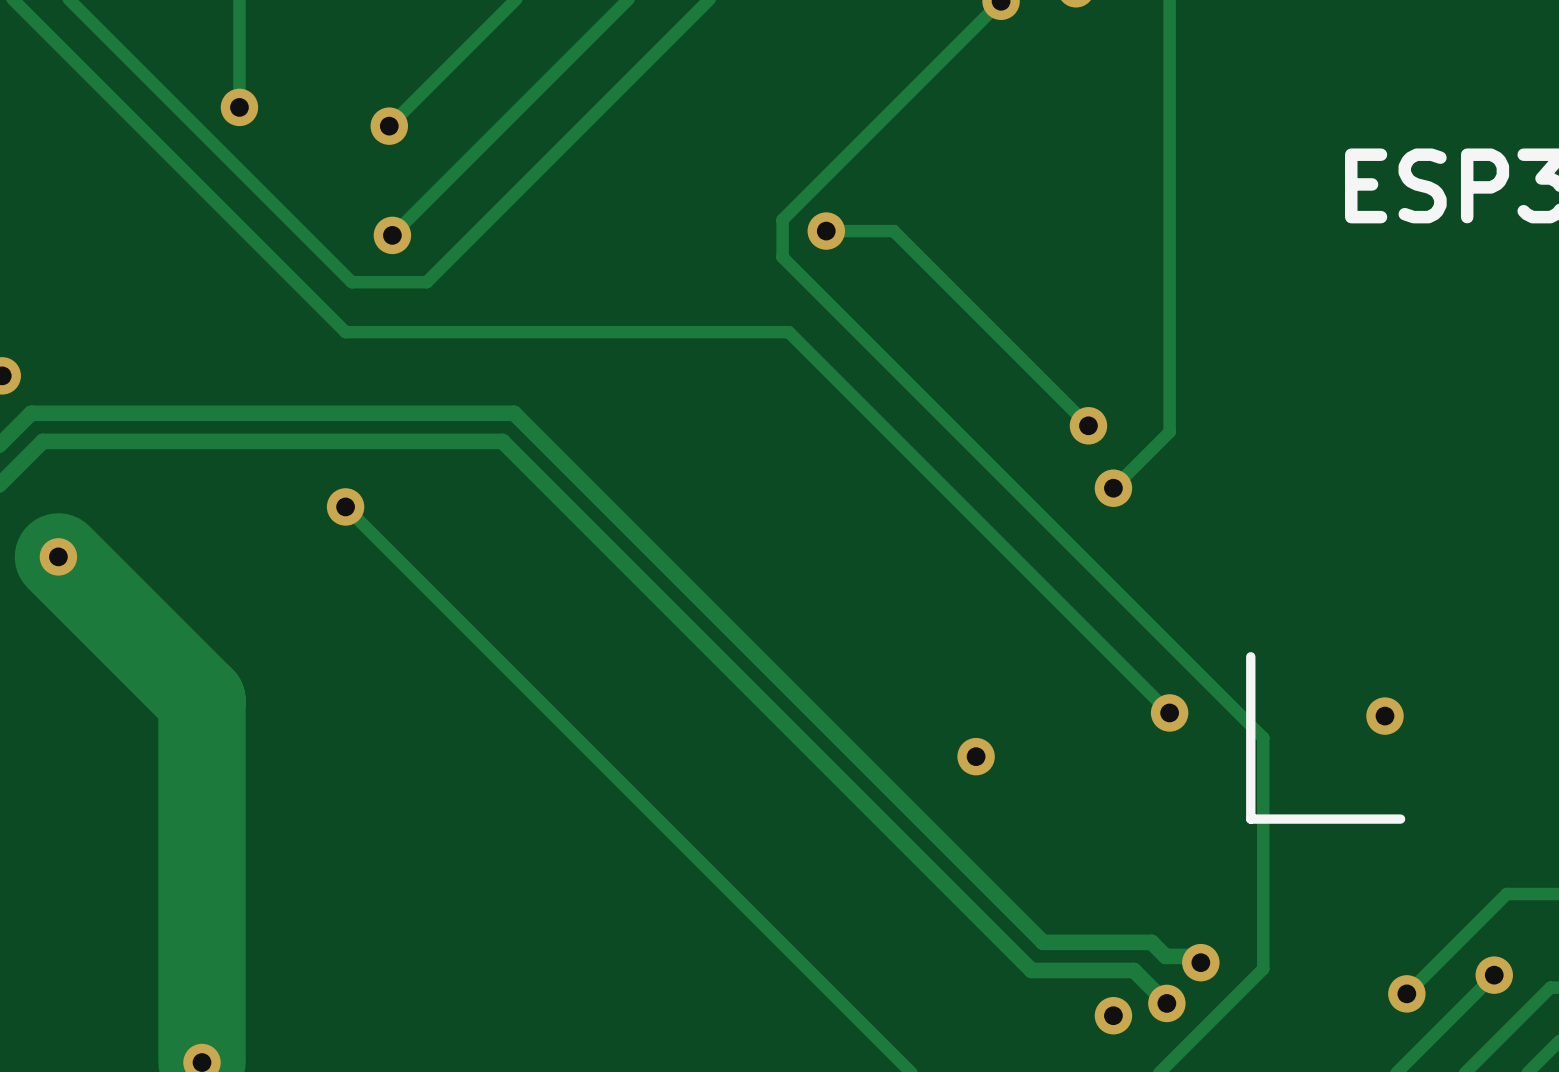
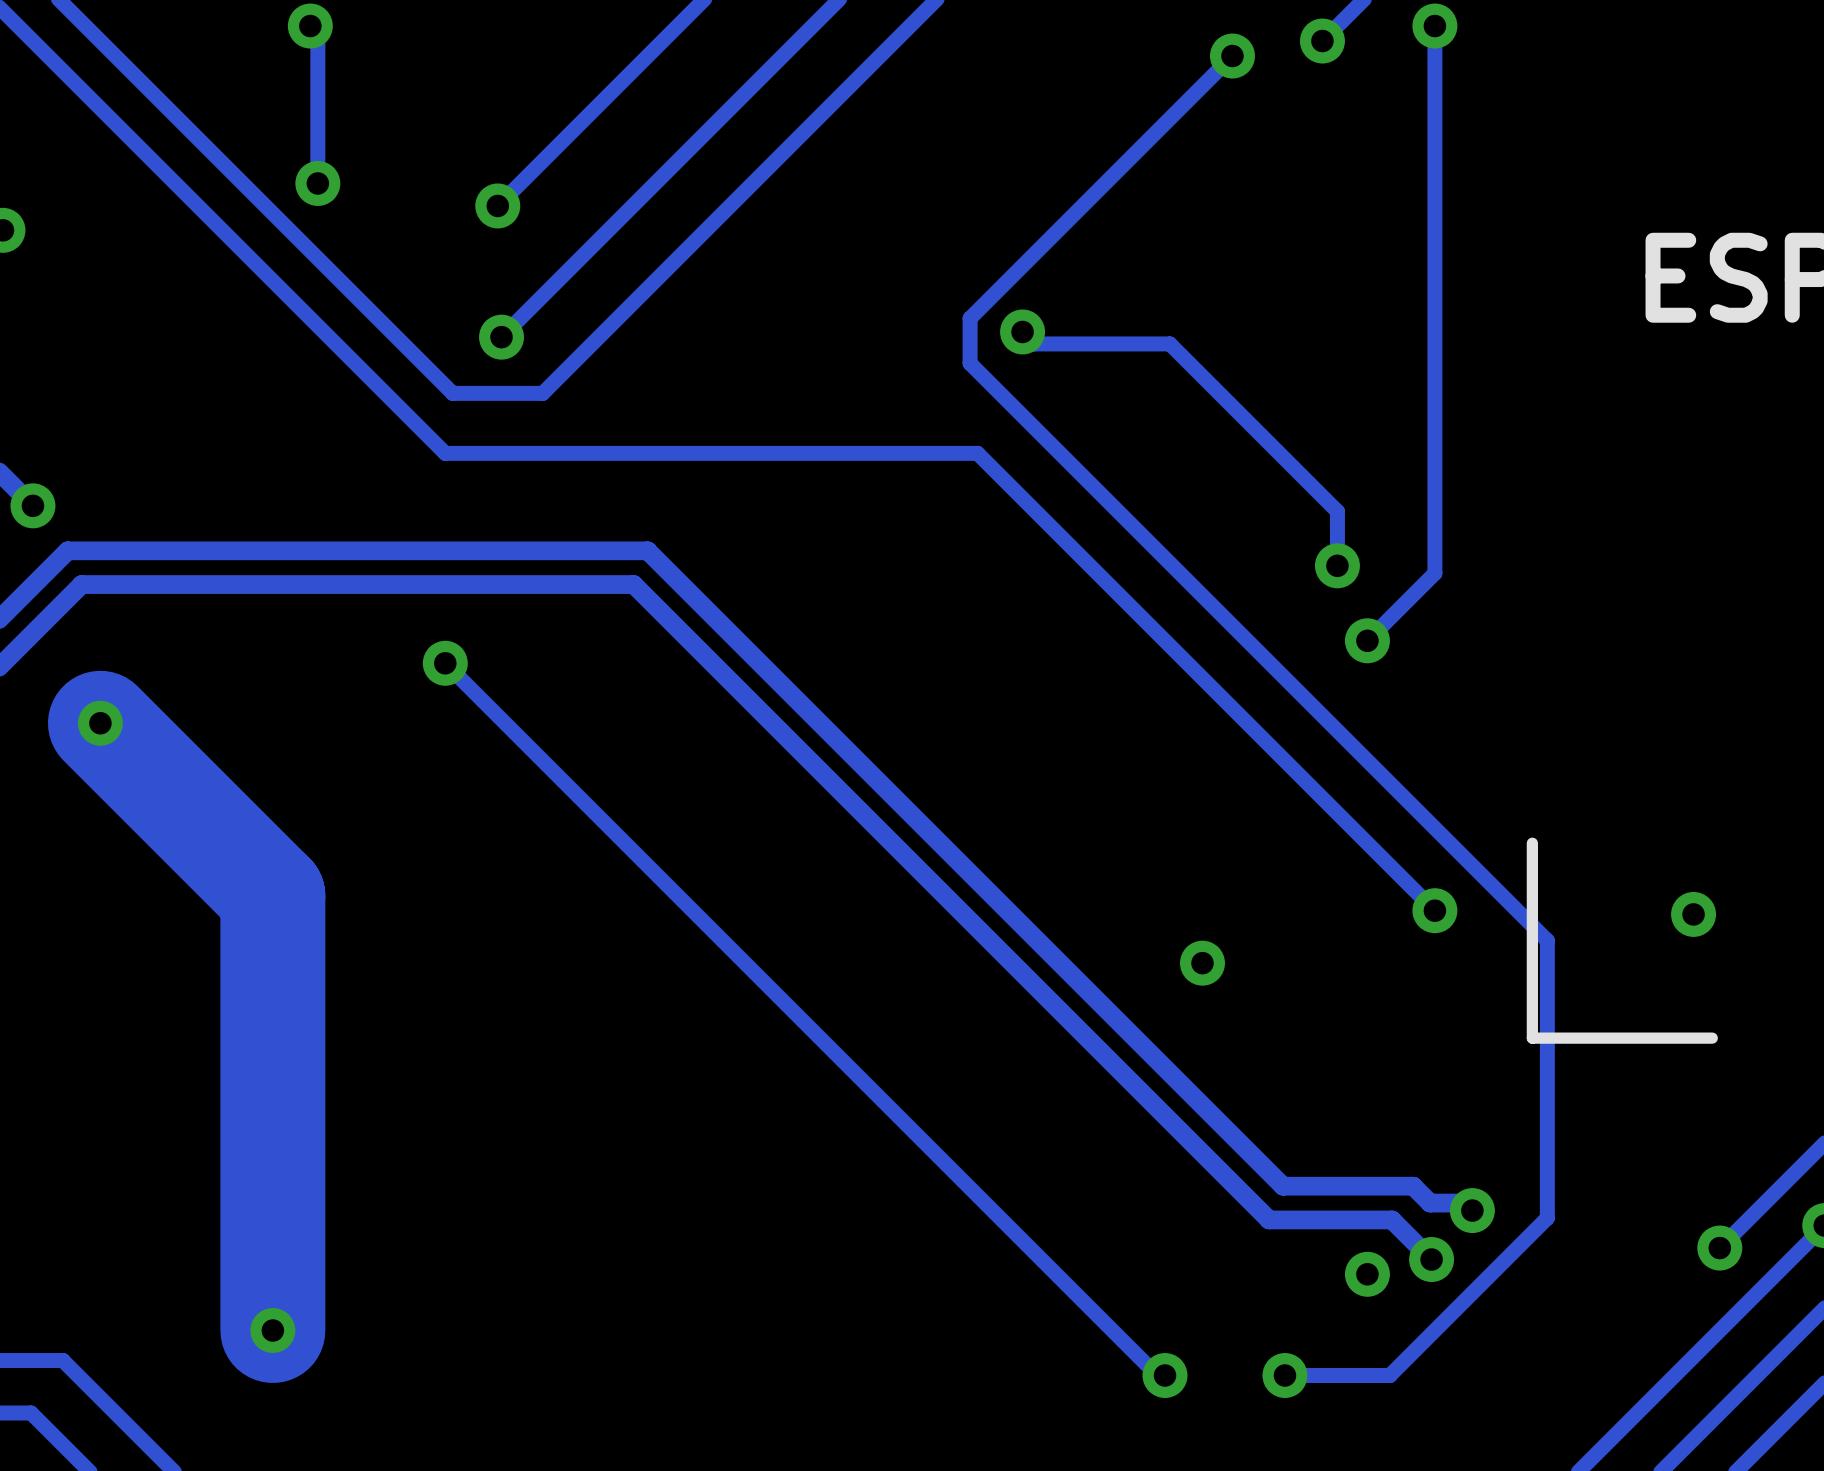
track: (826, 231) (893, 231) (1088, 425) -> (1022, 331) (1034, 343) (1169, 343) (1337, 511) (1337, 565)

